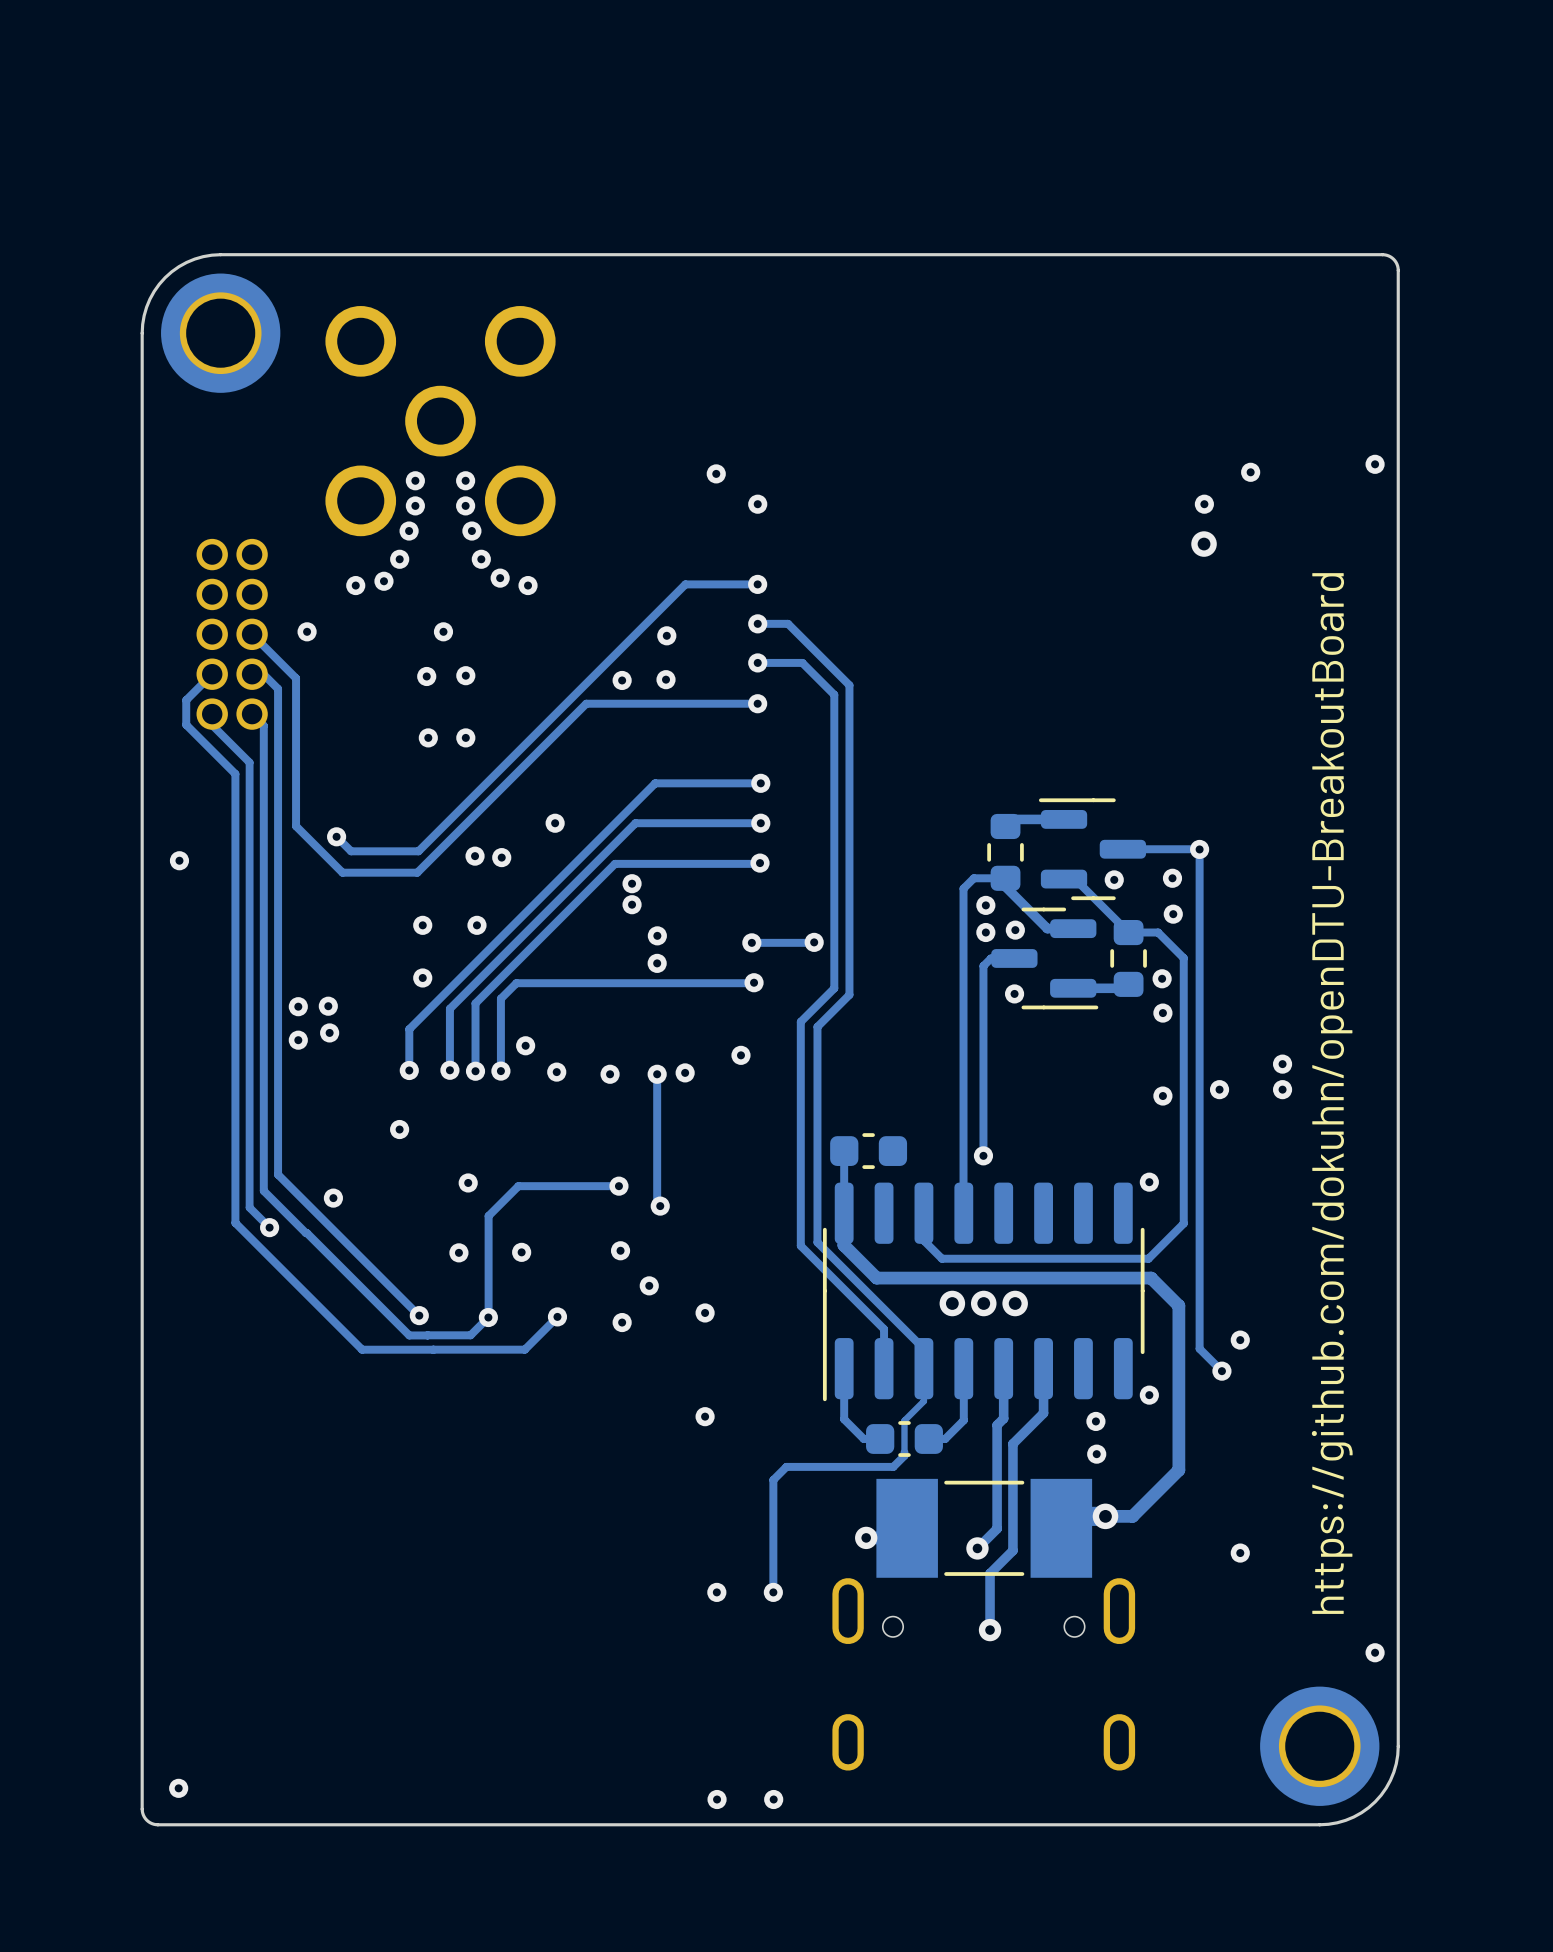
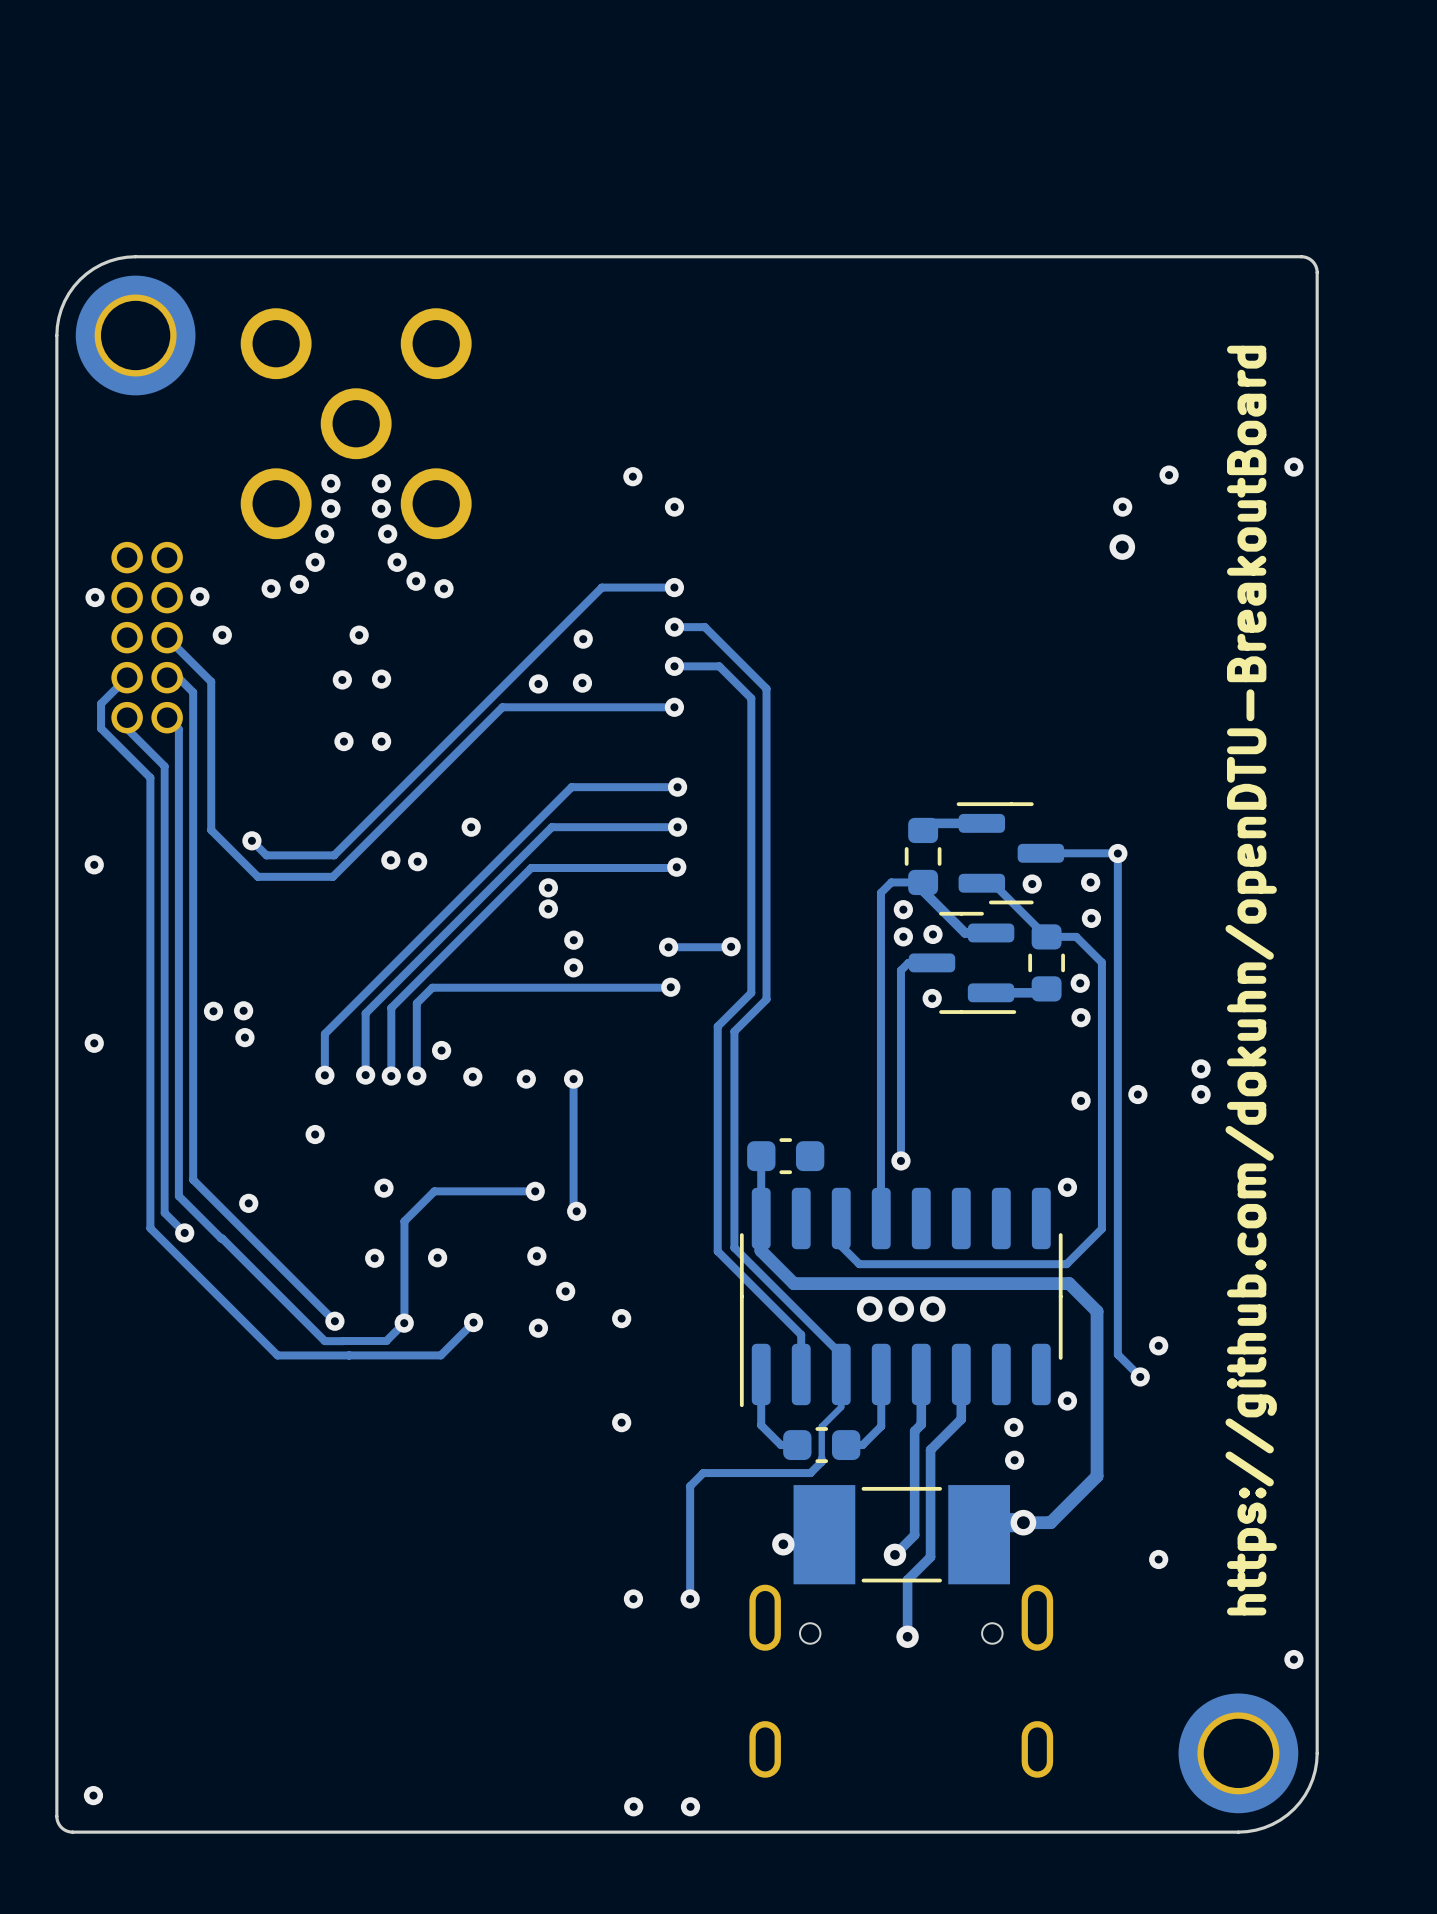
via: none -> (199, 596)
via: none -> (95, 597)
via: (422, 925) -> none
via: (476, 925) -> none
via: (422, 977) -> none
via position: (298, 1040) -> (94, 1043)
via: (740, 1055) -> none
via: (685, 1072) -> none

